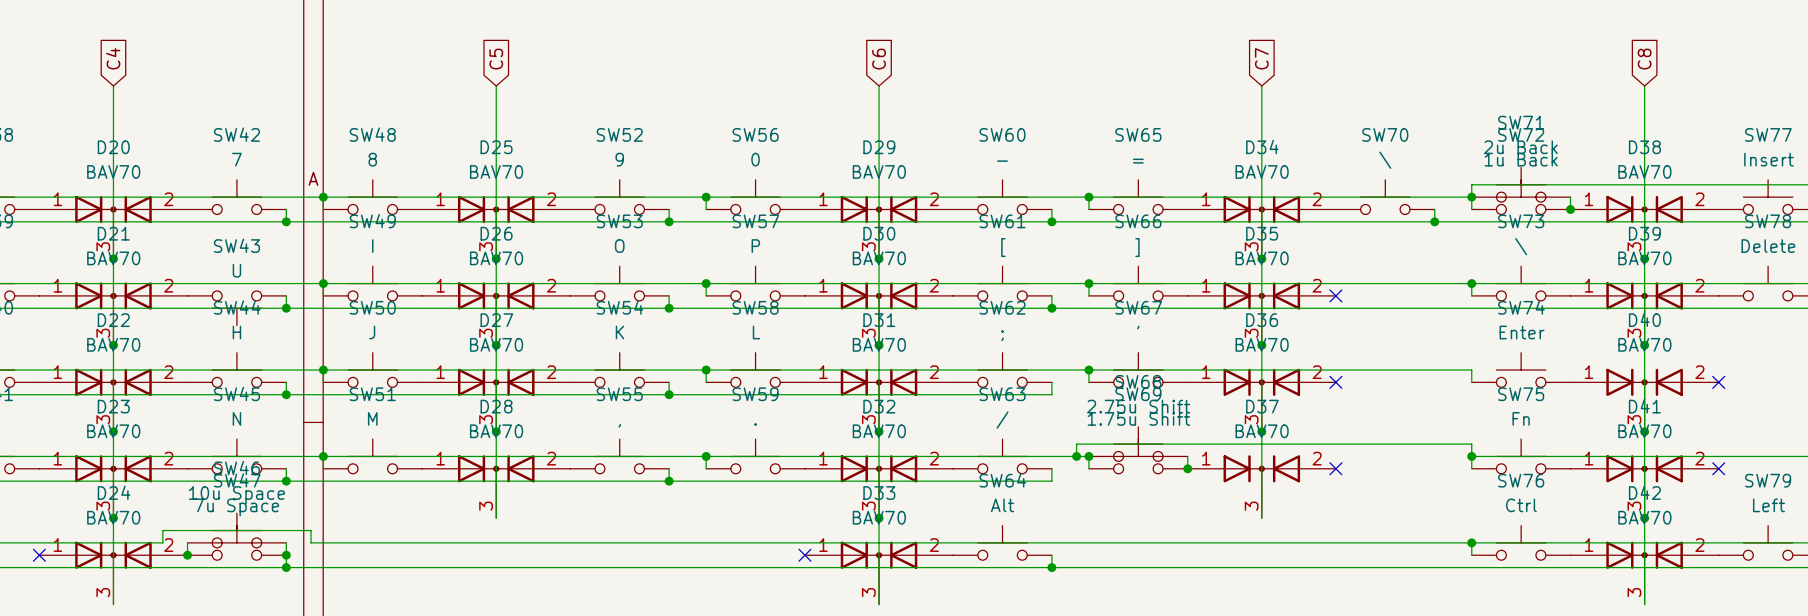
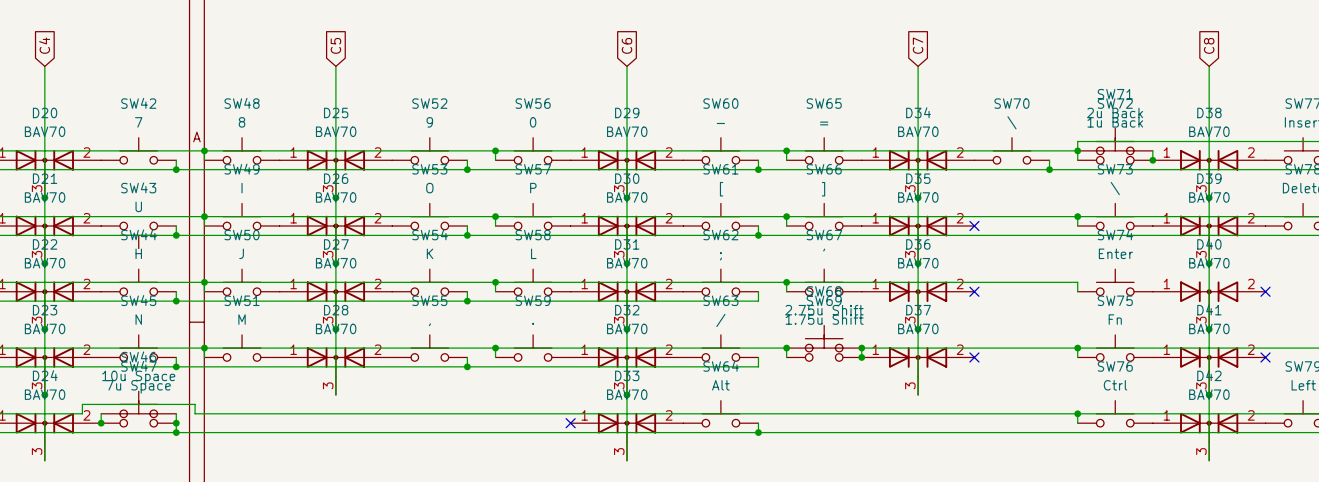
wire: (1076, 456) (1076, 444) (1471, 444) (1471, 456) -> (861, 348) (1077, 348)
junction: (1076, 456) -> none
junction: none -> (861, 348)

